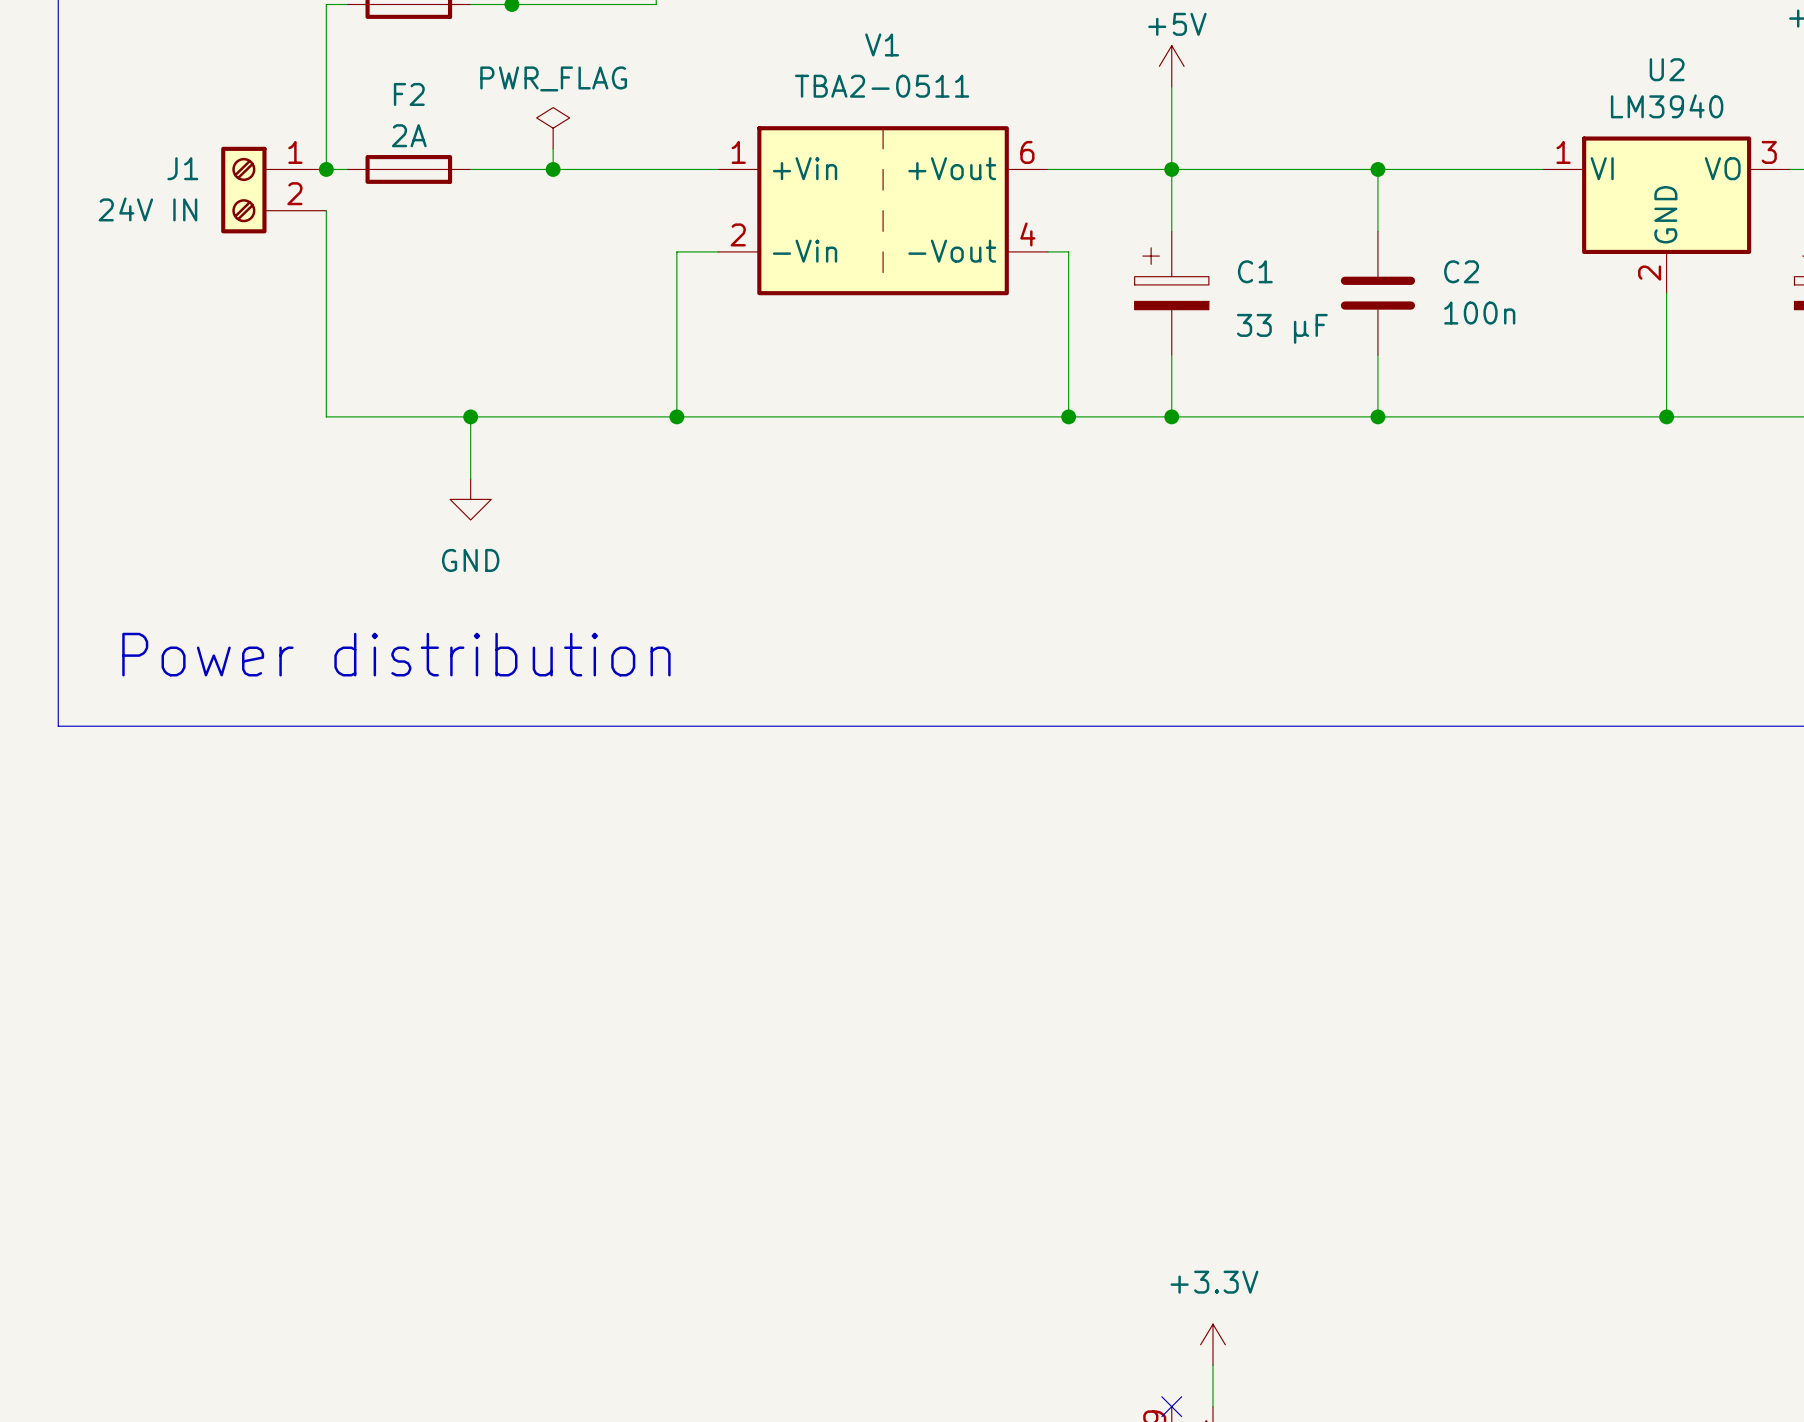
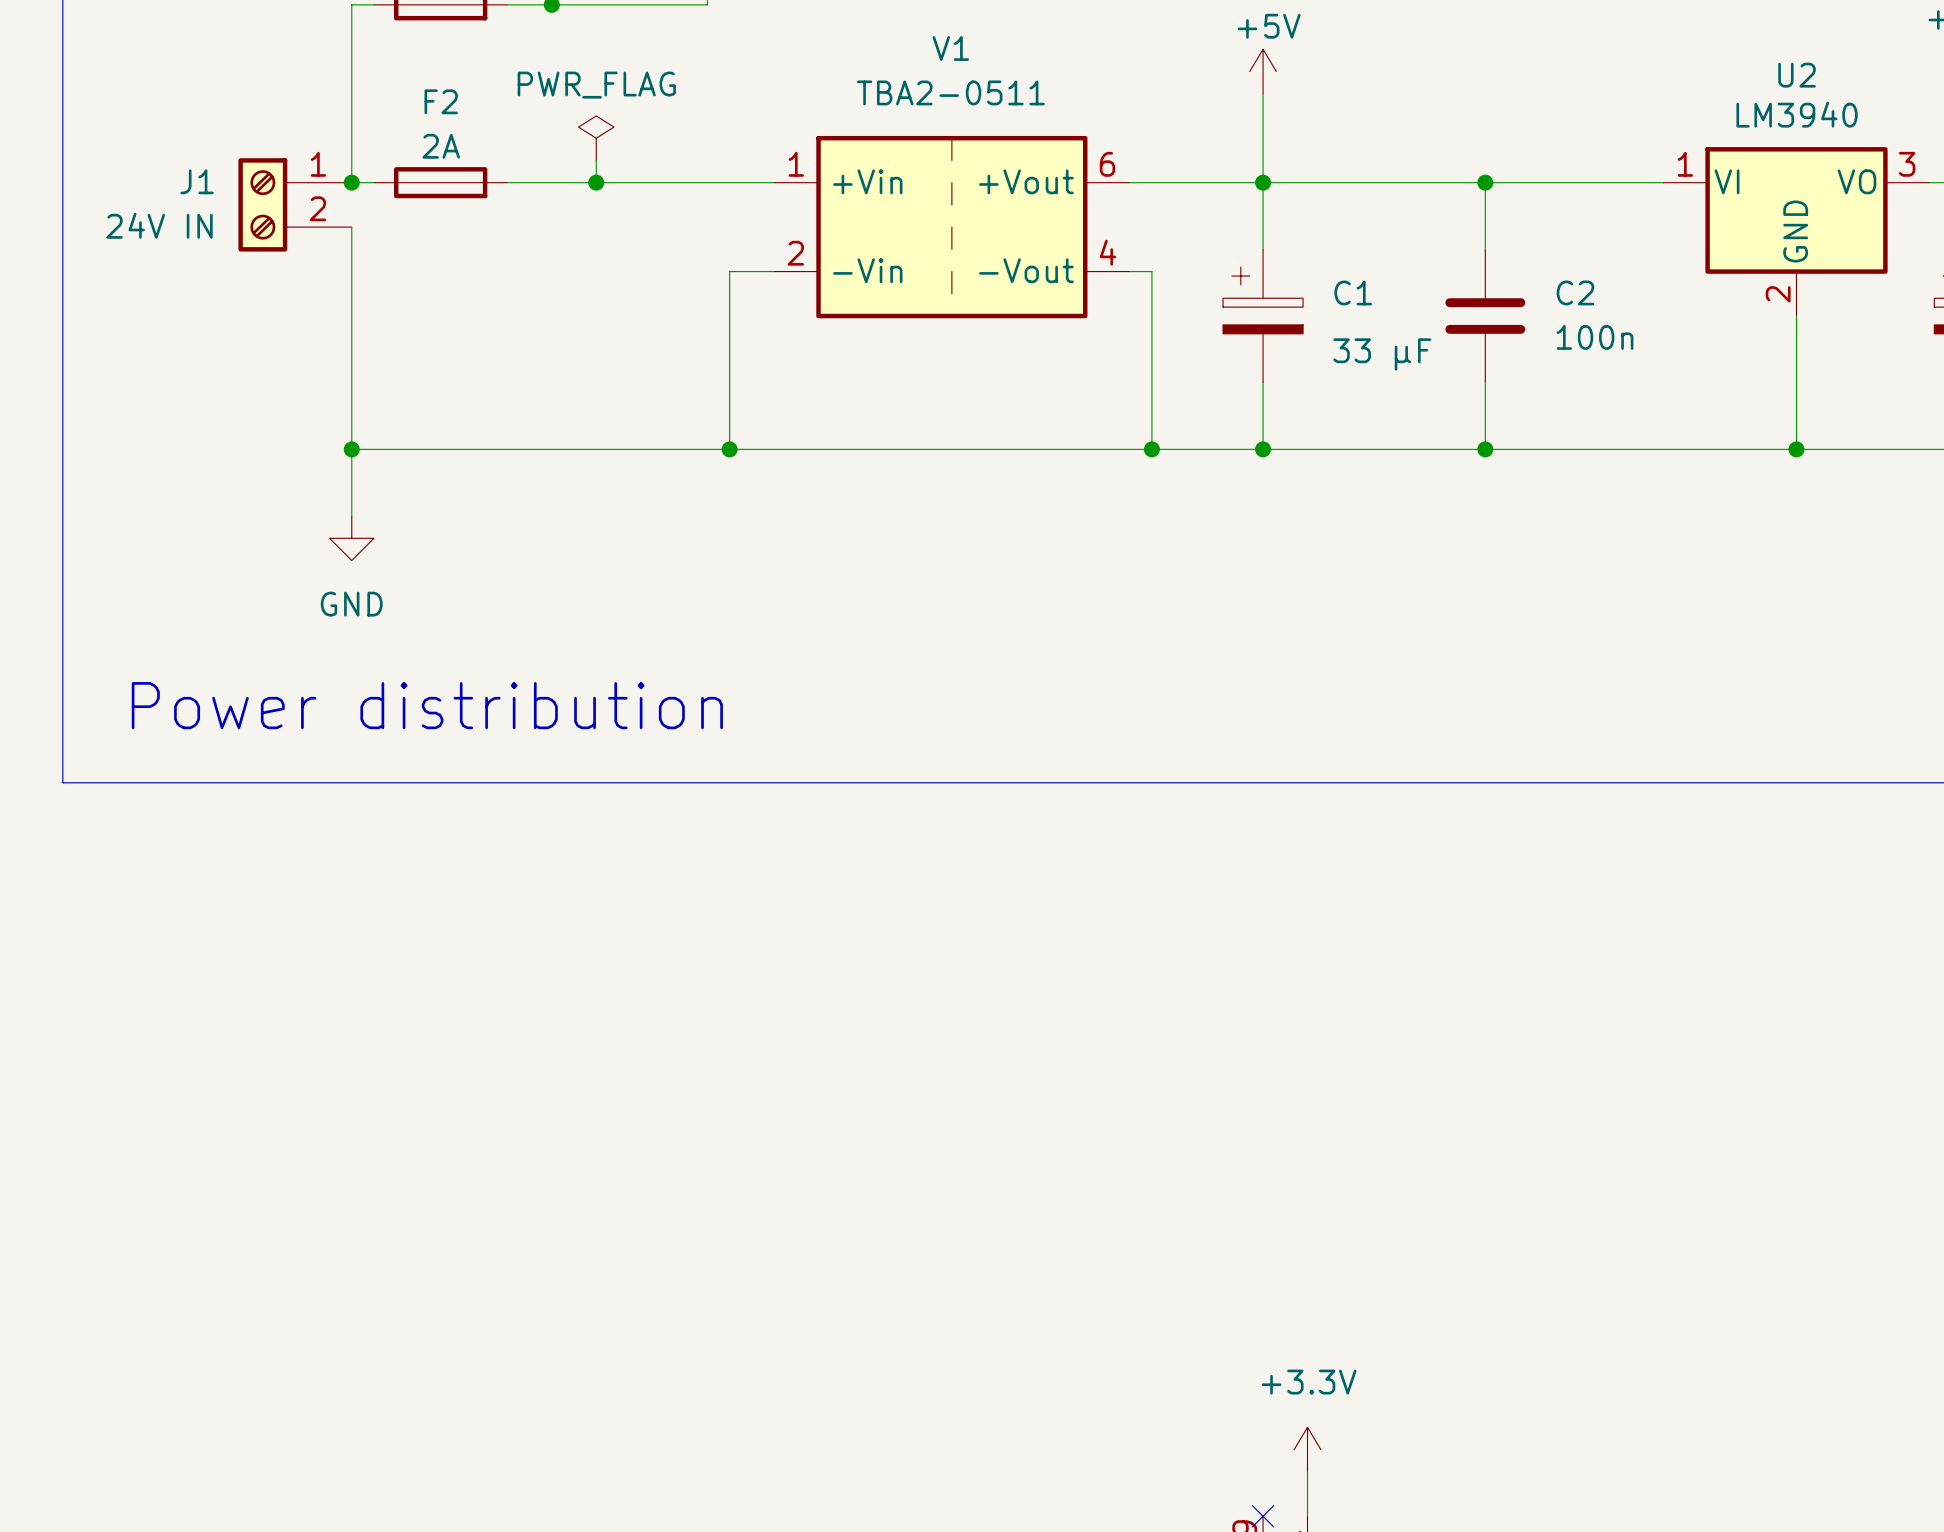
junction: none -> (351, 449)
wire: (470, 416) (470, 478) -> (351, 449) (351, 516)
junction: (470, 416) -> none
power symbol position: GND (470, 499) -> GND (351, 538)

